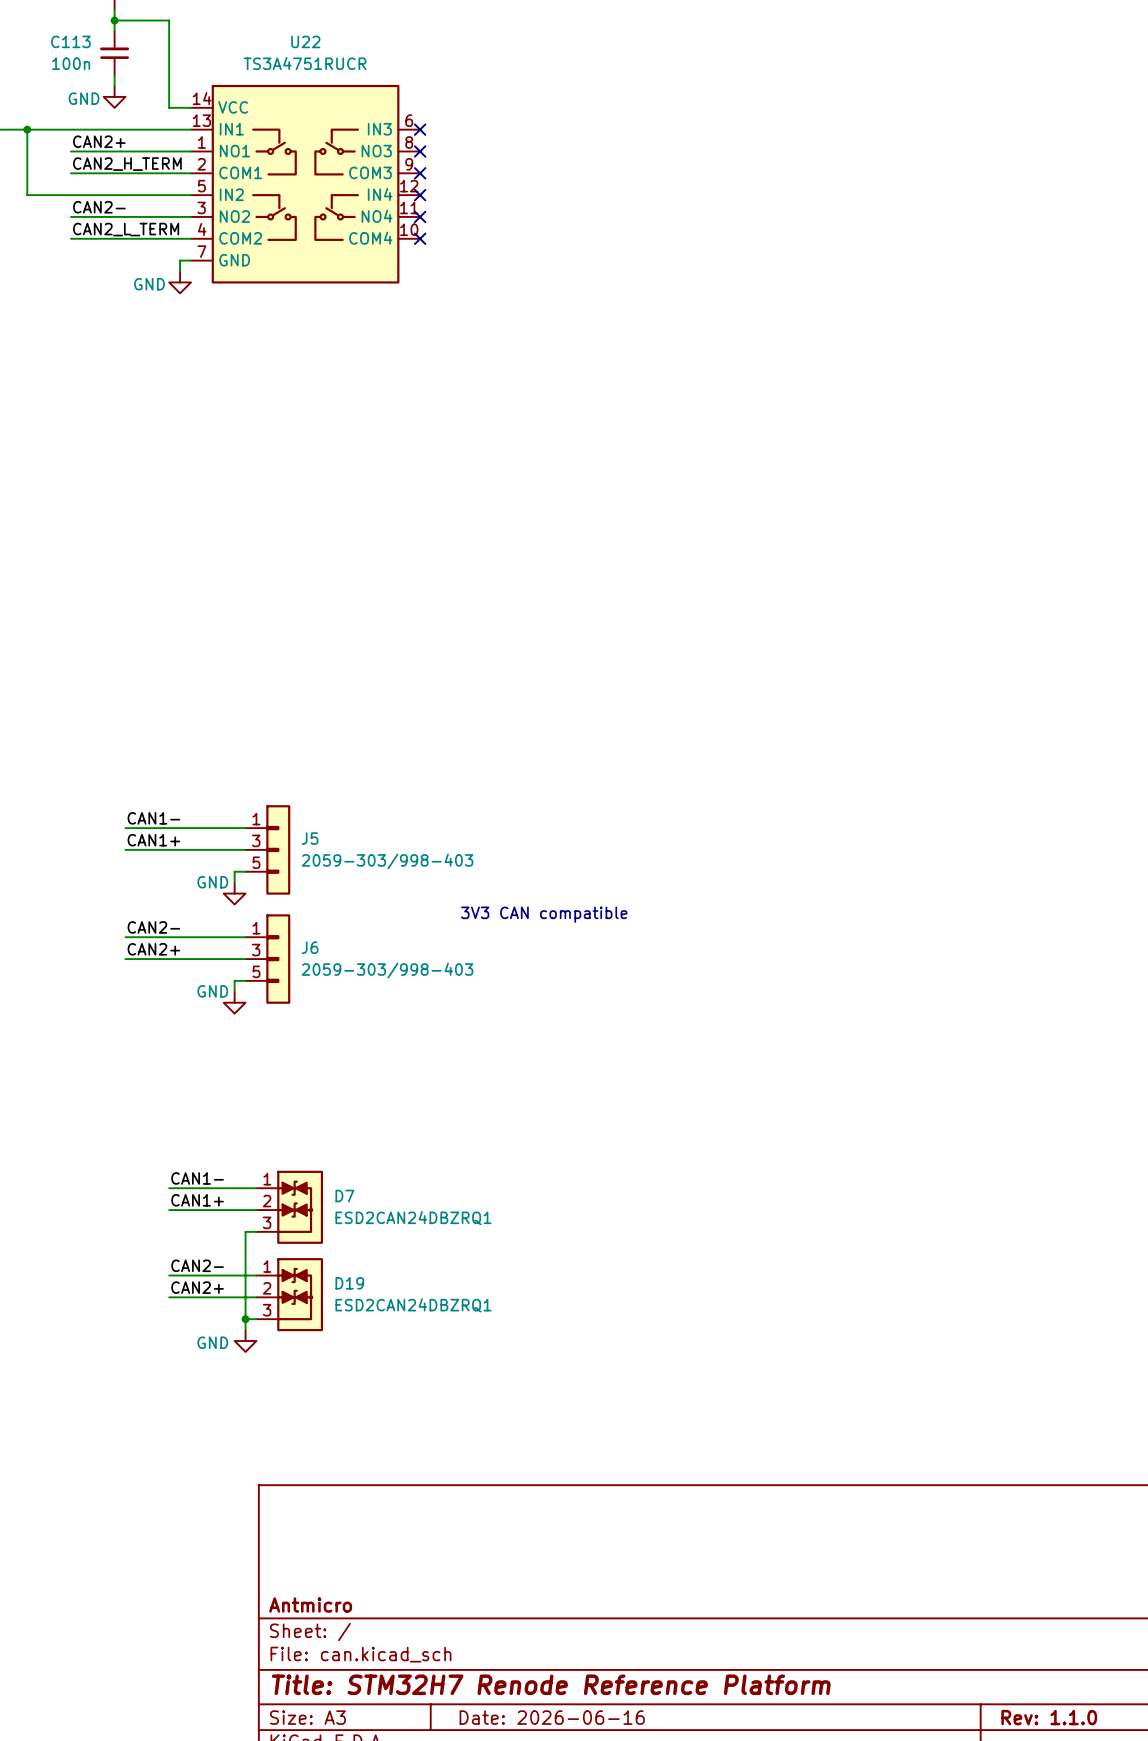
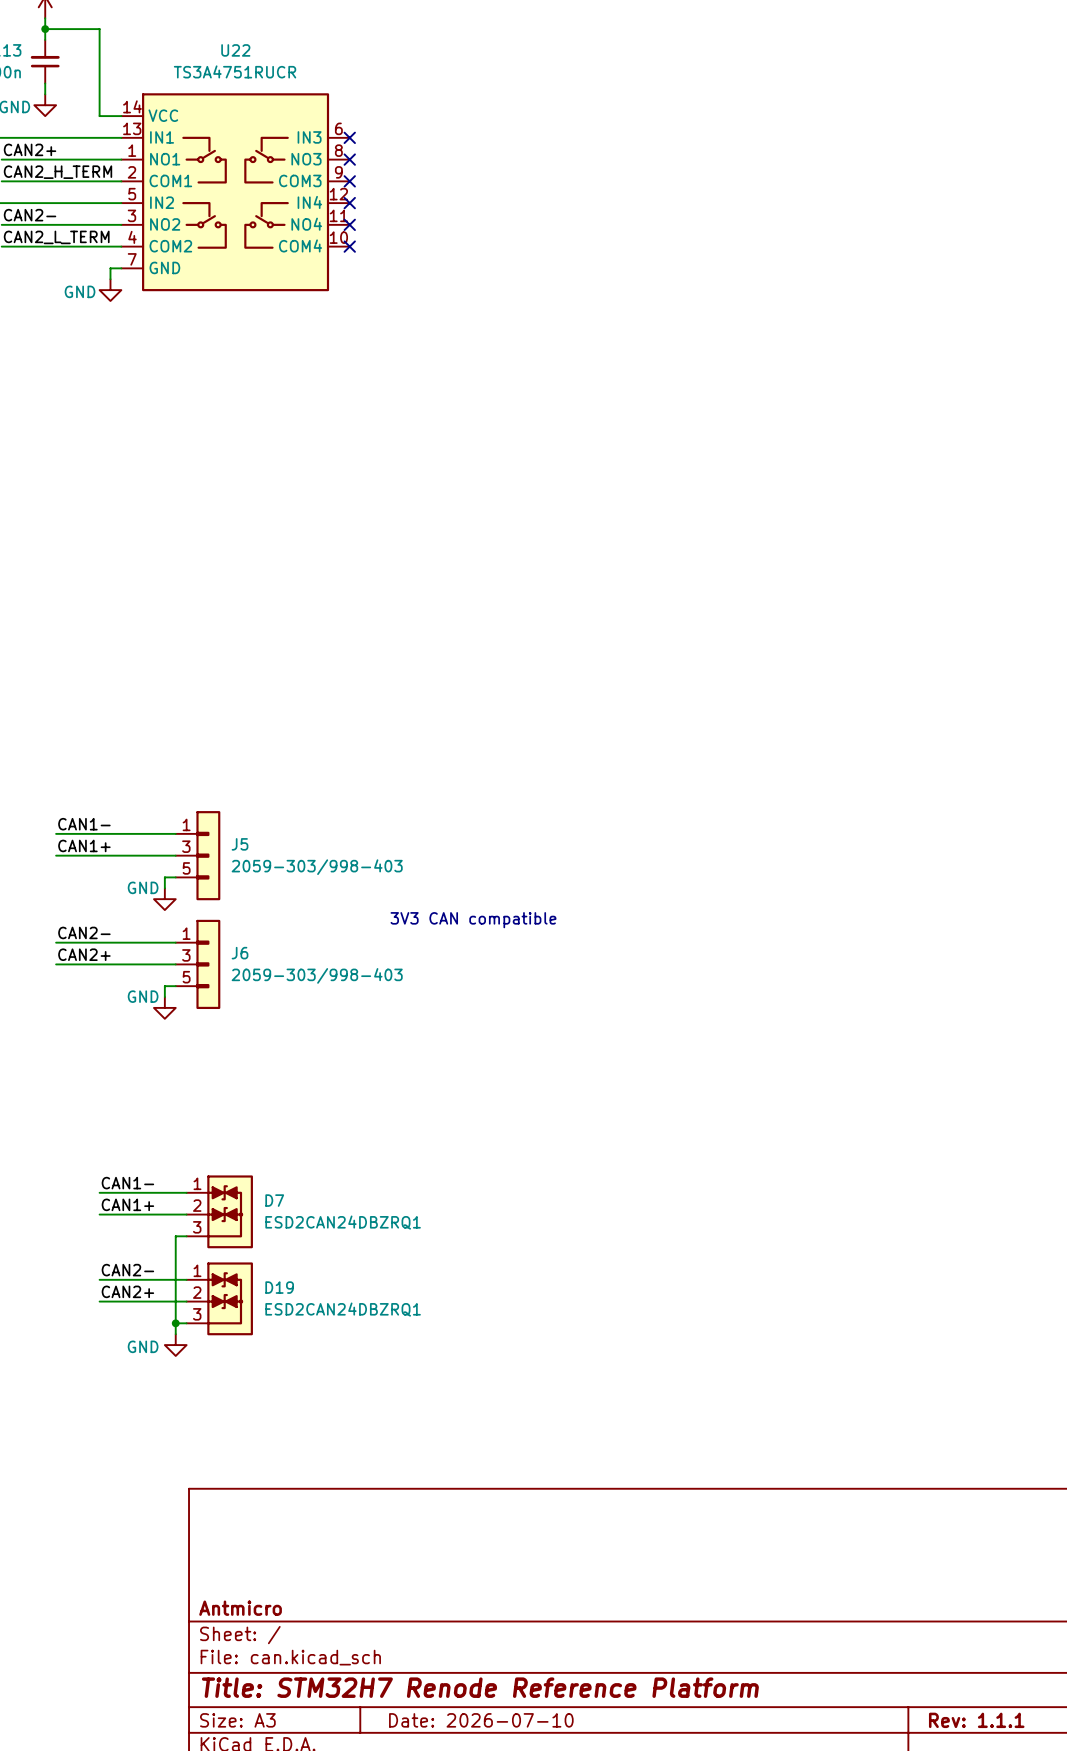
title block: Date: 2026-06-16 (552, 1717) -> Date: 2026-07-10 (481, 1720)
title block: Rev: 1.1.0 (1049, 1717) -> Rev: 1.1.1 (976, 1720)

